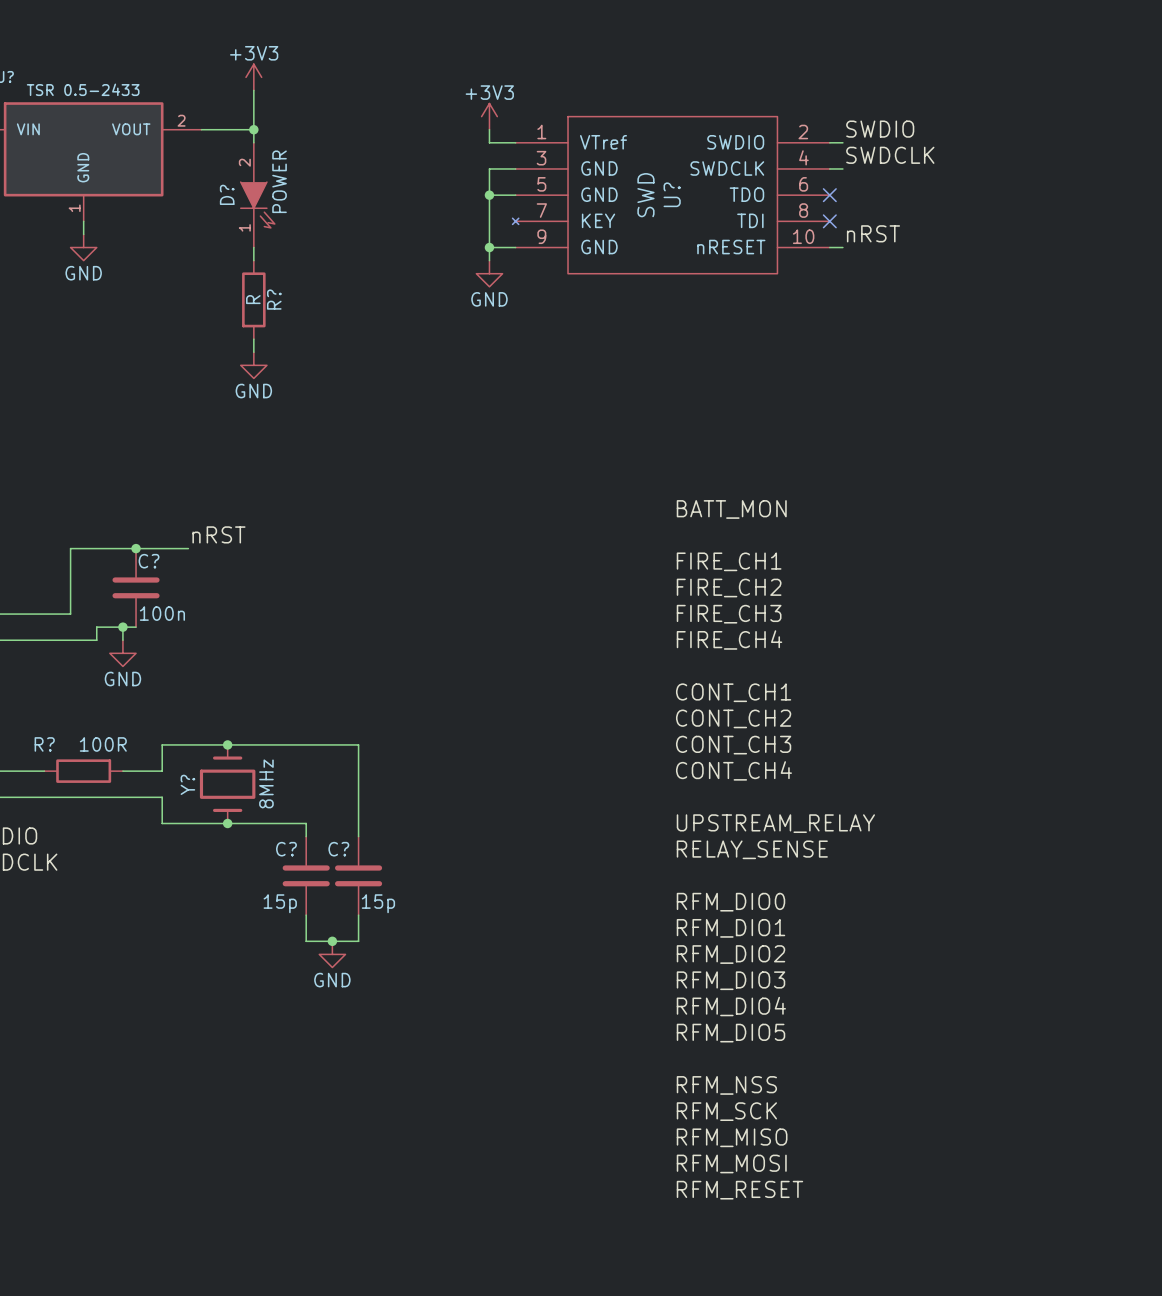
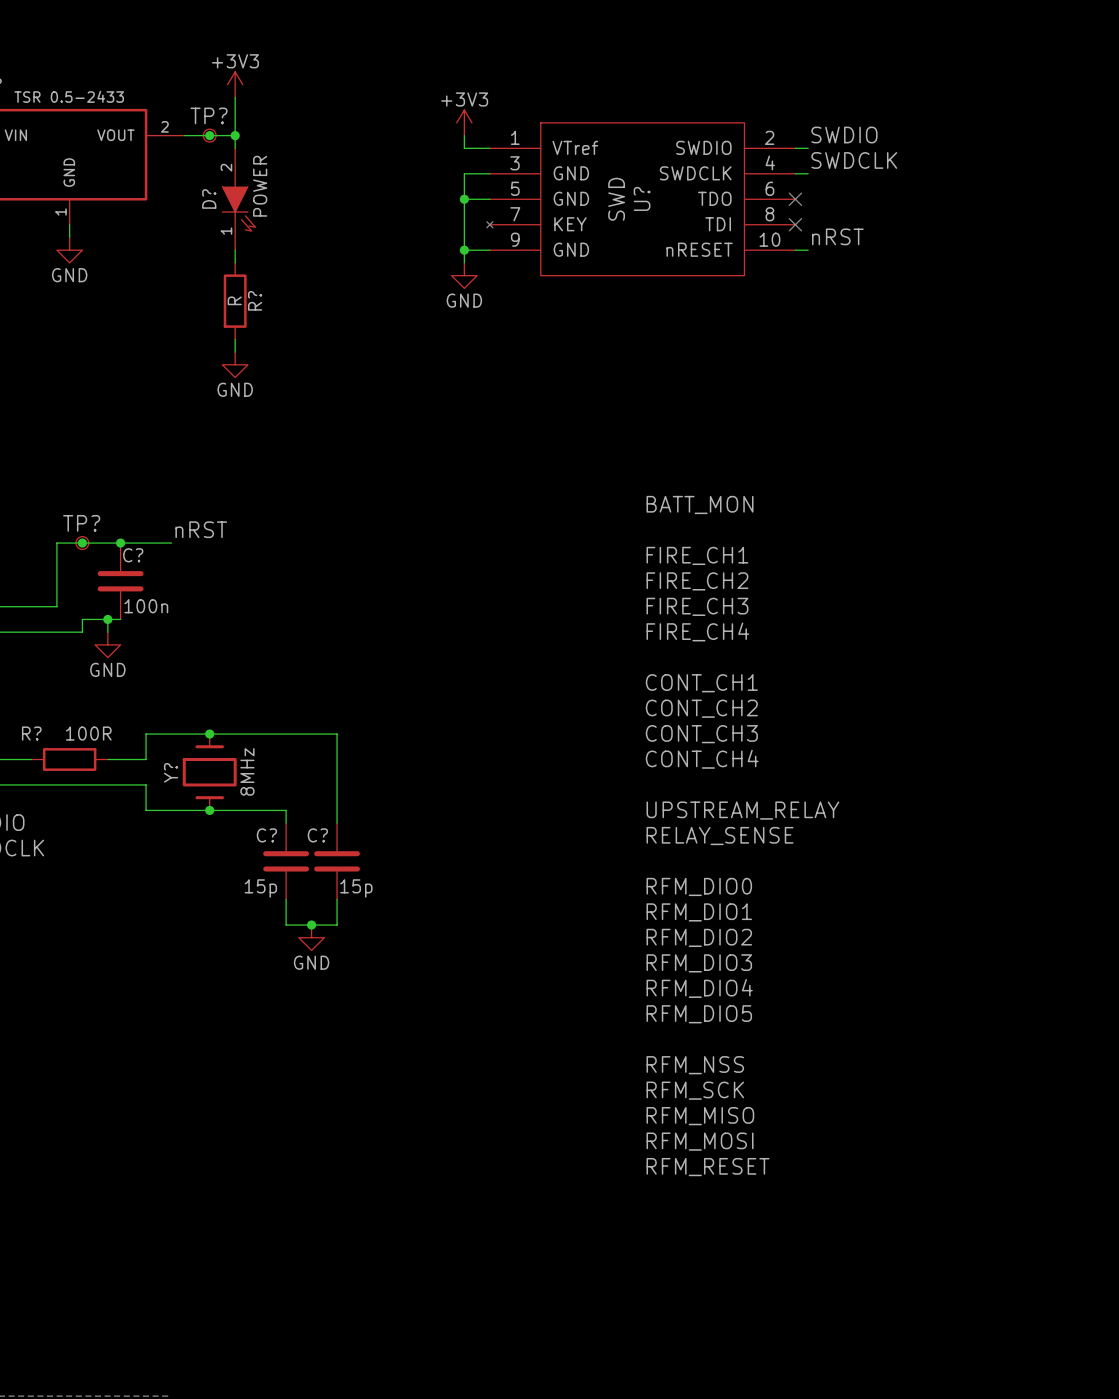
TP?: none -> (209, 135)
junction: none -> (209, 135)
TP?: none -> (82, 543)
junction: none -> (82, 543)

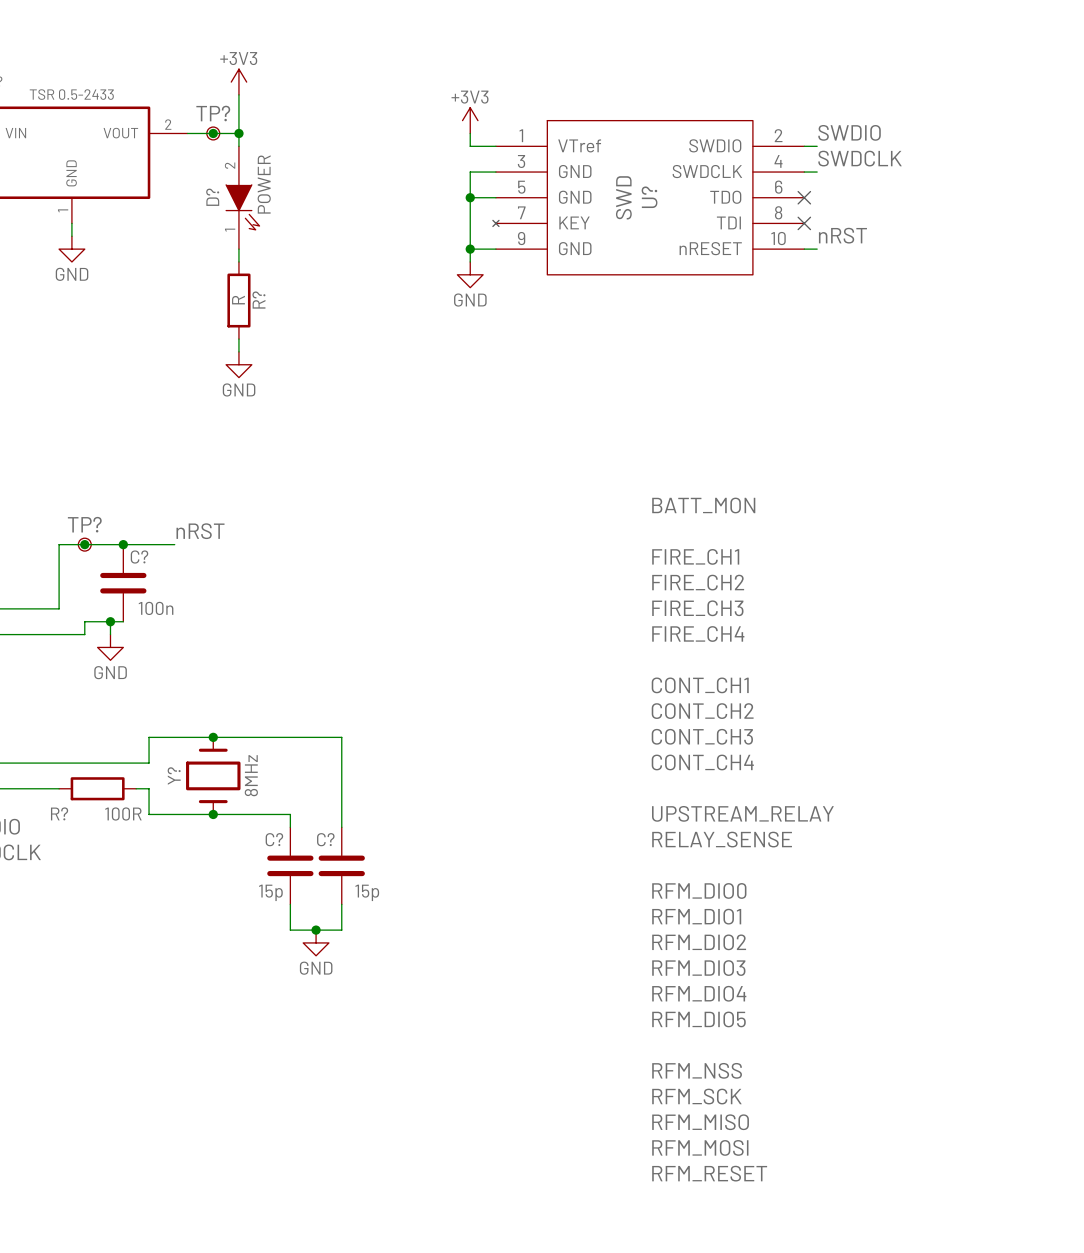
R? name position: R? (31, 733) -> R? (59, 813)
R? value position: 100R (88, 733) -> 100R (123, 813)
R? position: (69, 759) -> (97, 788)
wire: (56, 784) (133, 784) -> (33, 763) (110, 763)

